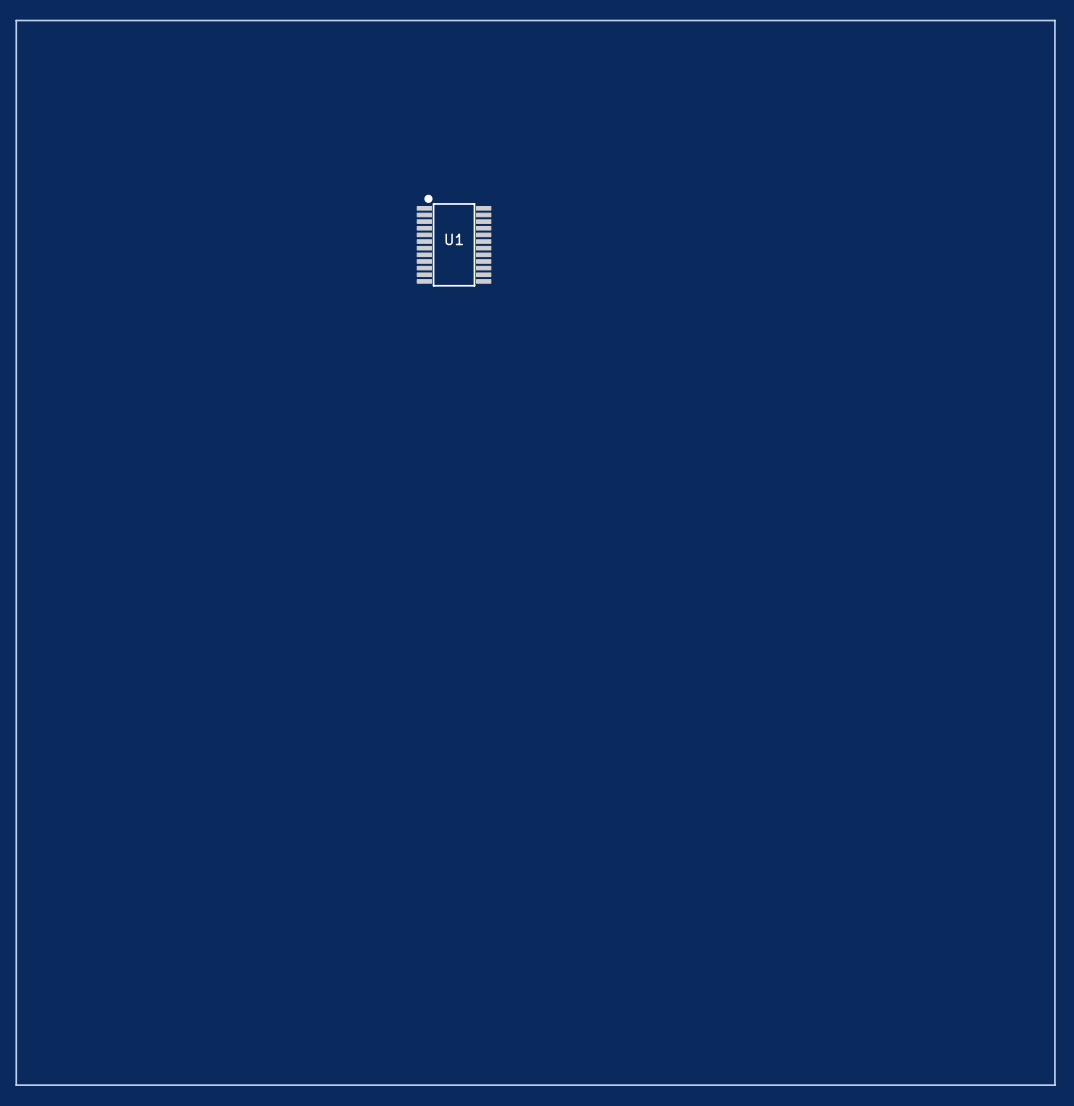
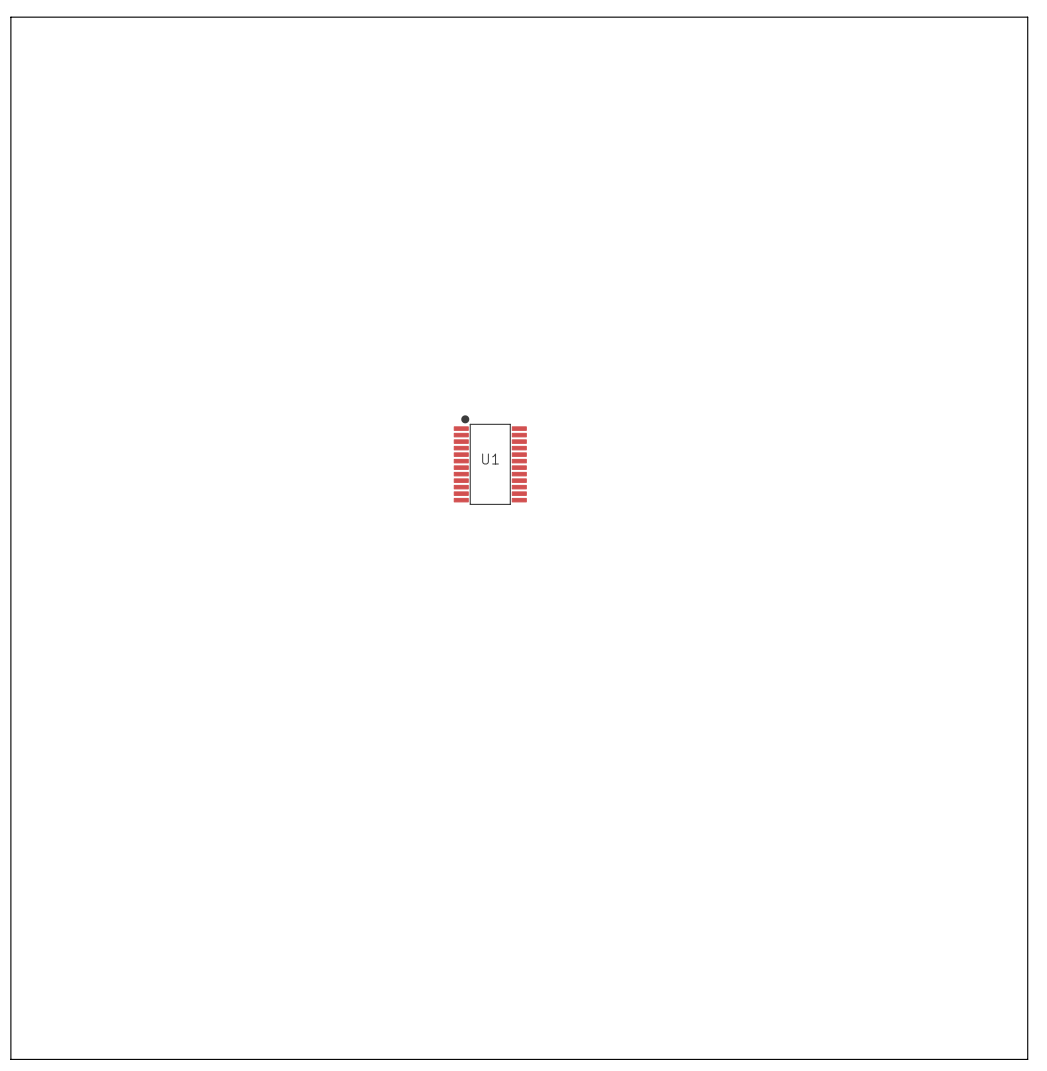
U1 position: (454, 240) -> (490, 460)

